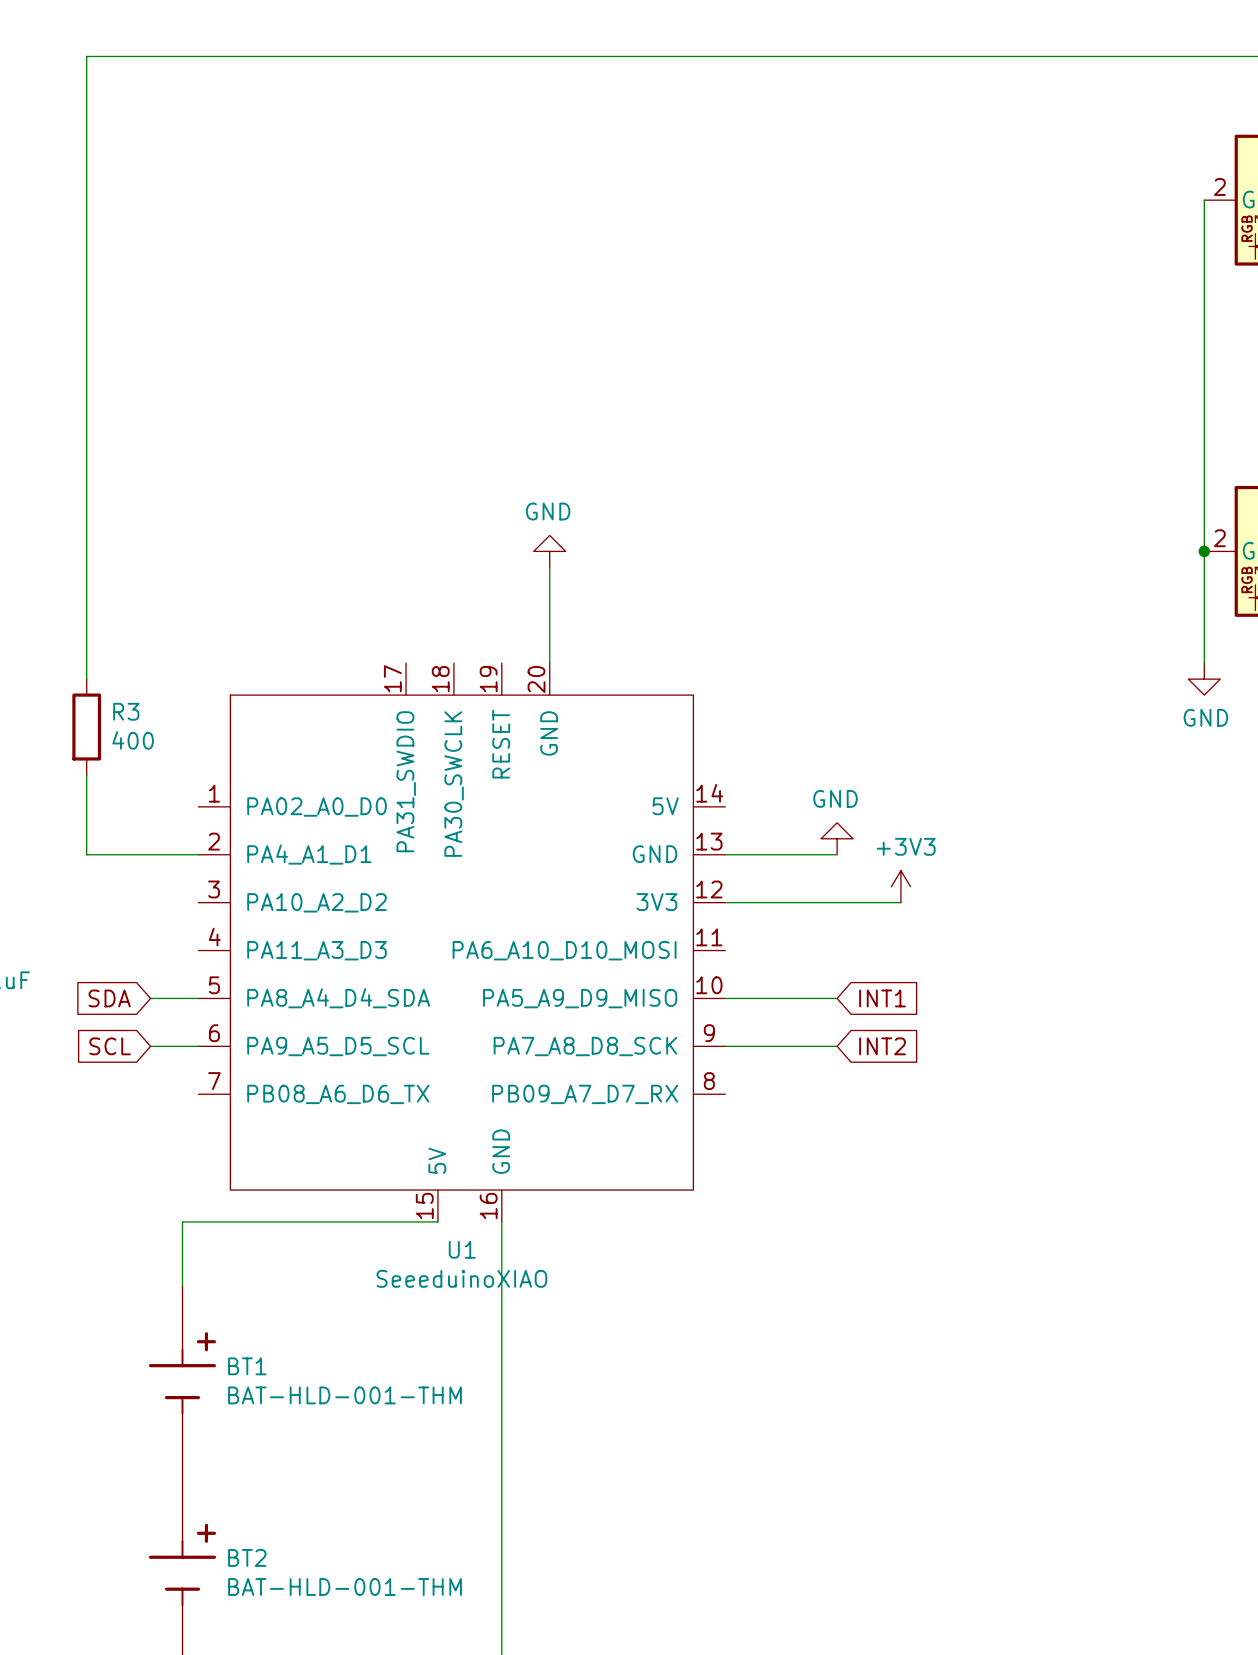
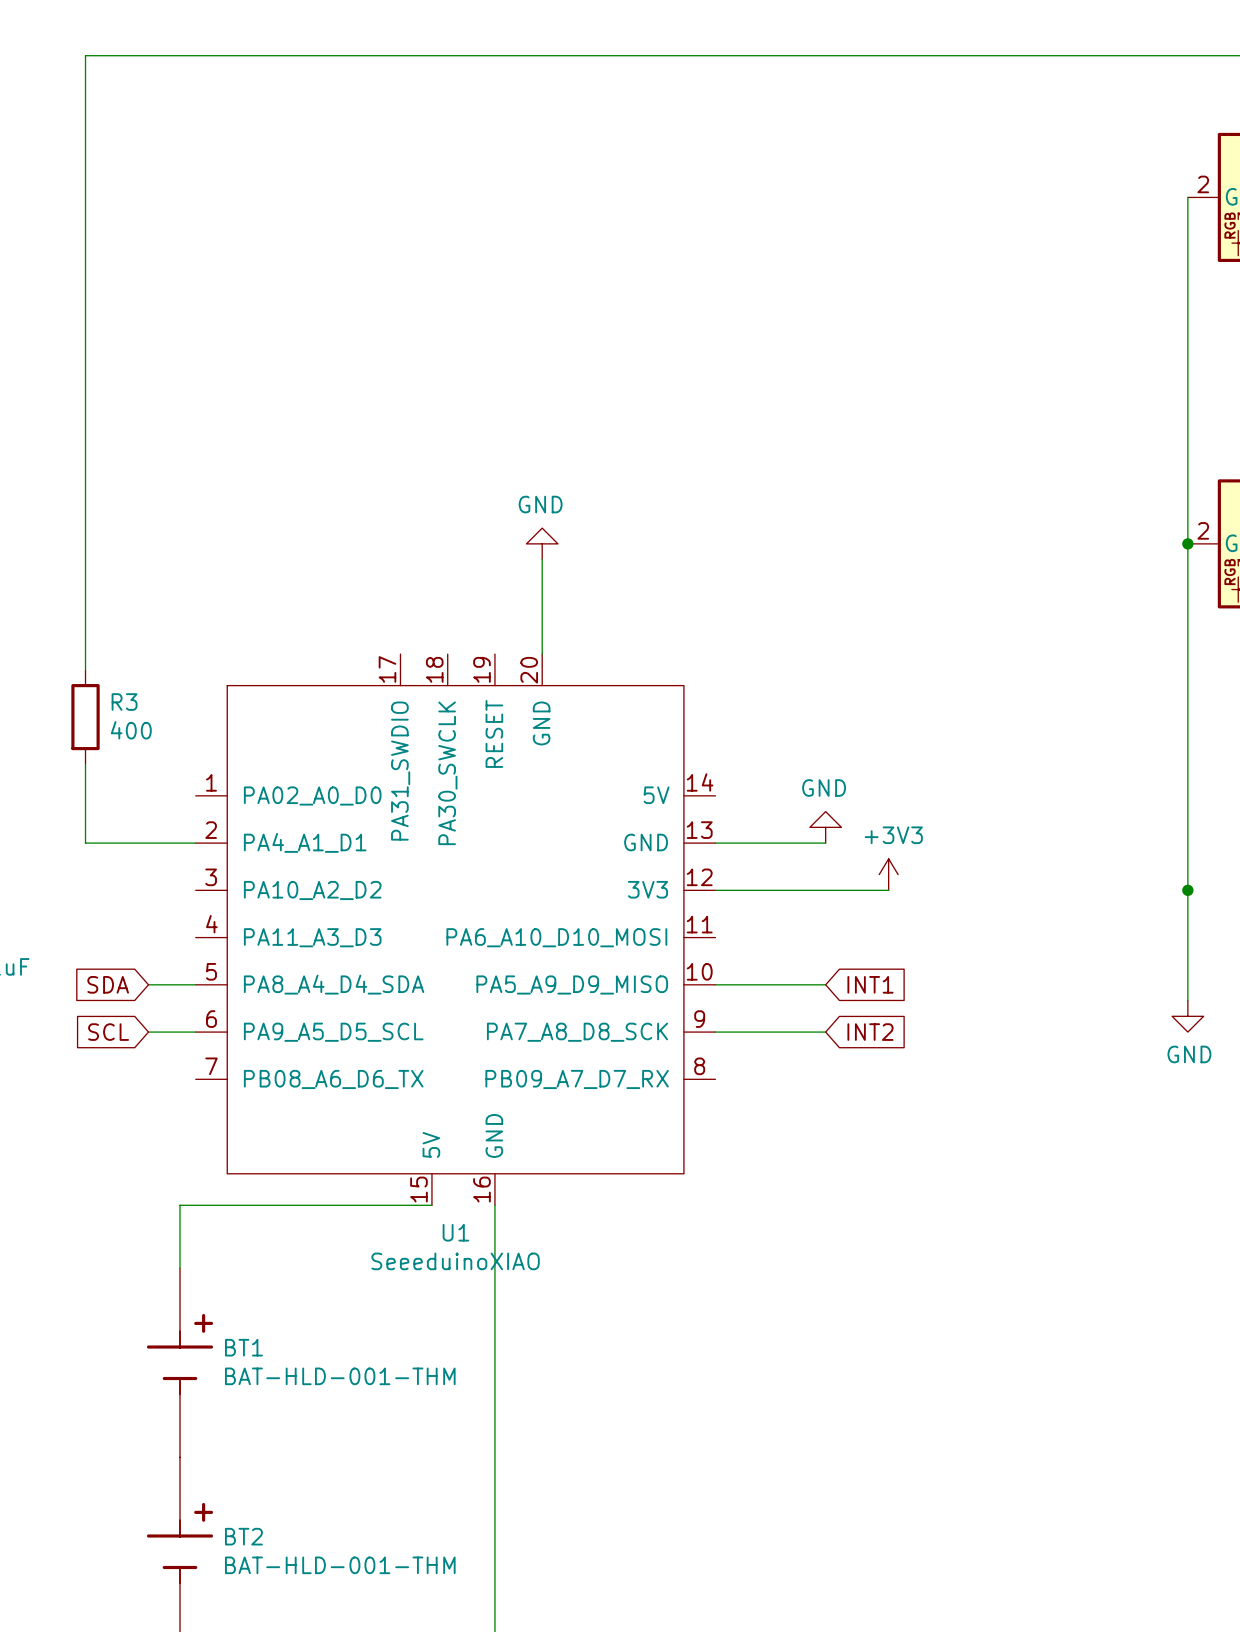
wire: none -> (1187, 654) (1187, 1000)
power symbol: GND (1204, 679) -> none
junction: none -> (1187, 890)
power symbol: none -> GND (1187, 1016)

